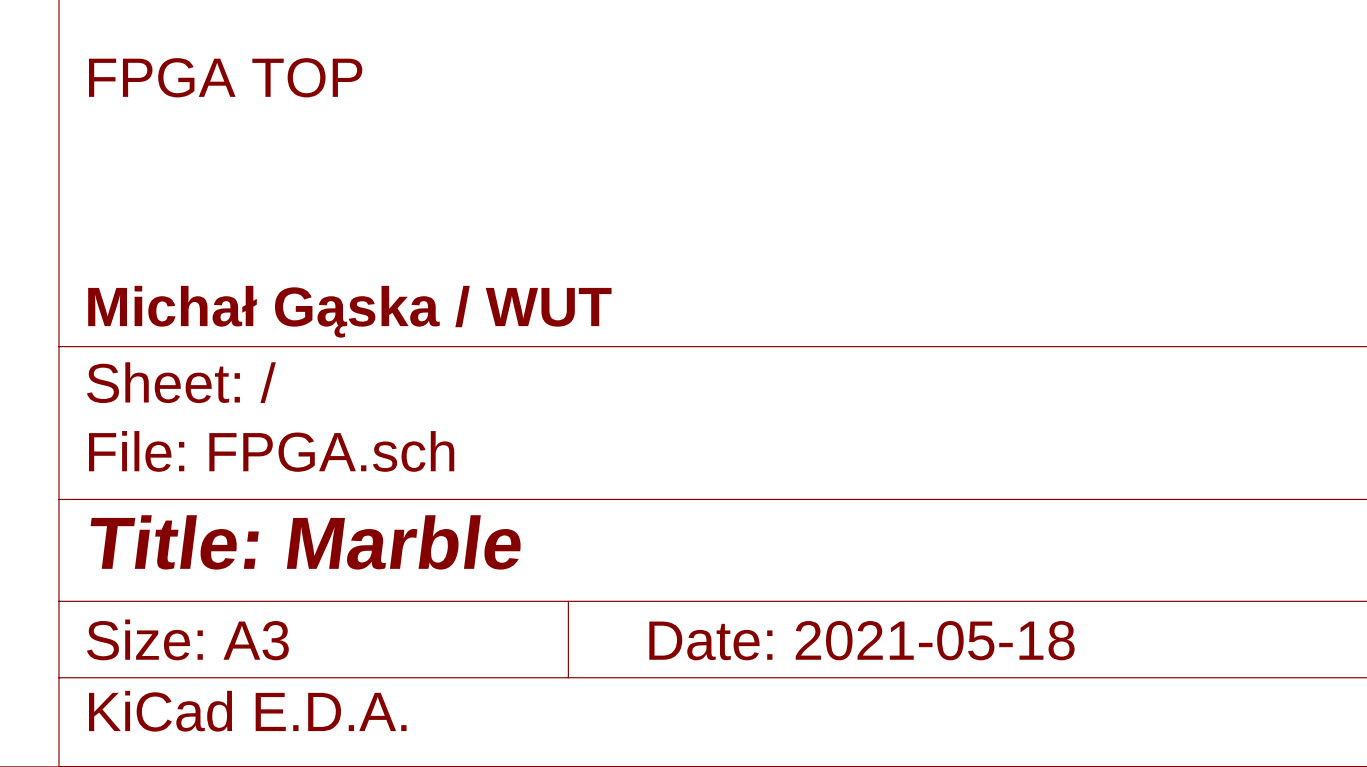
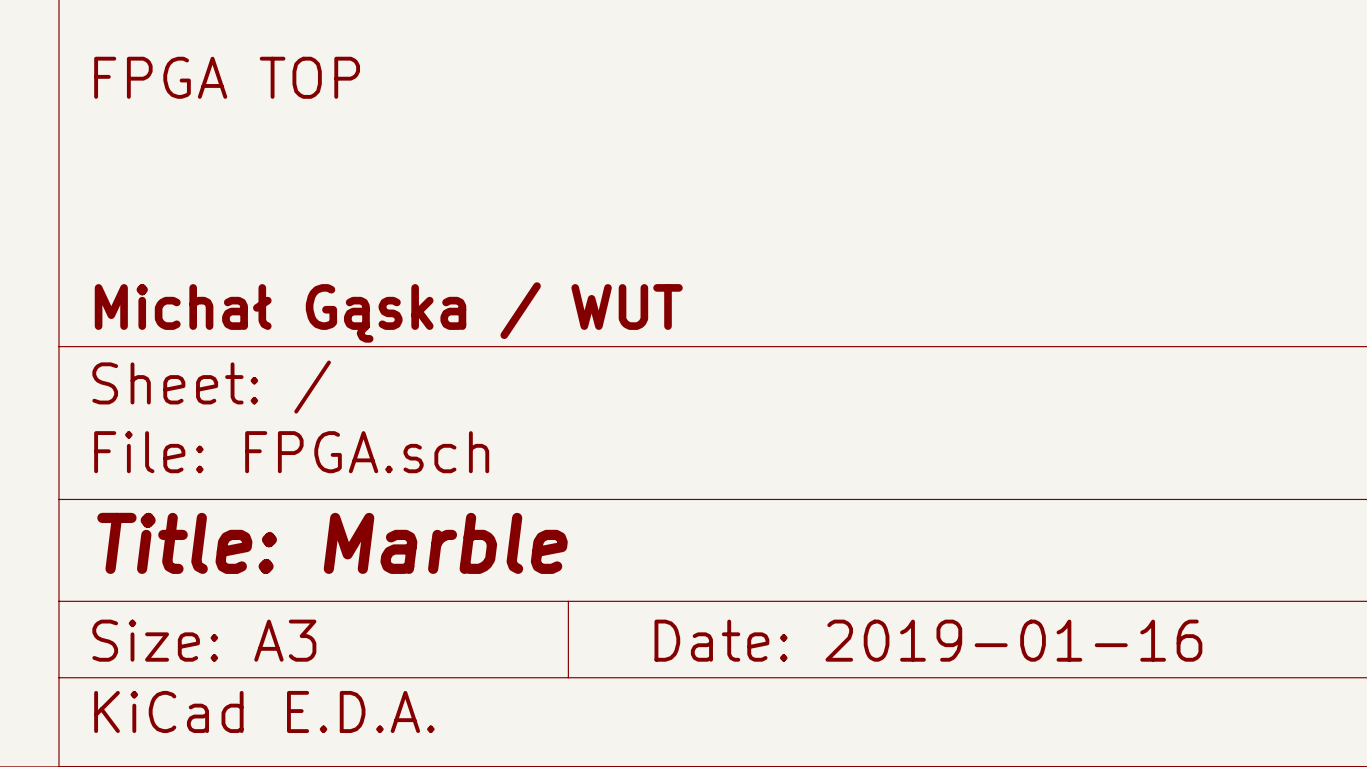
title block: Date: 2021-05-18 (861, 640) -> Date: 2019-01-16 (928, 640)

